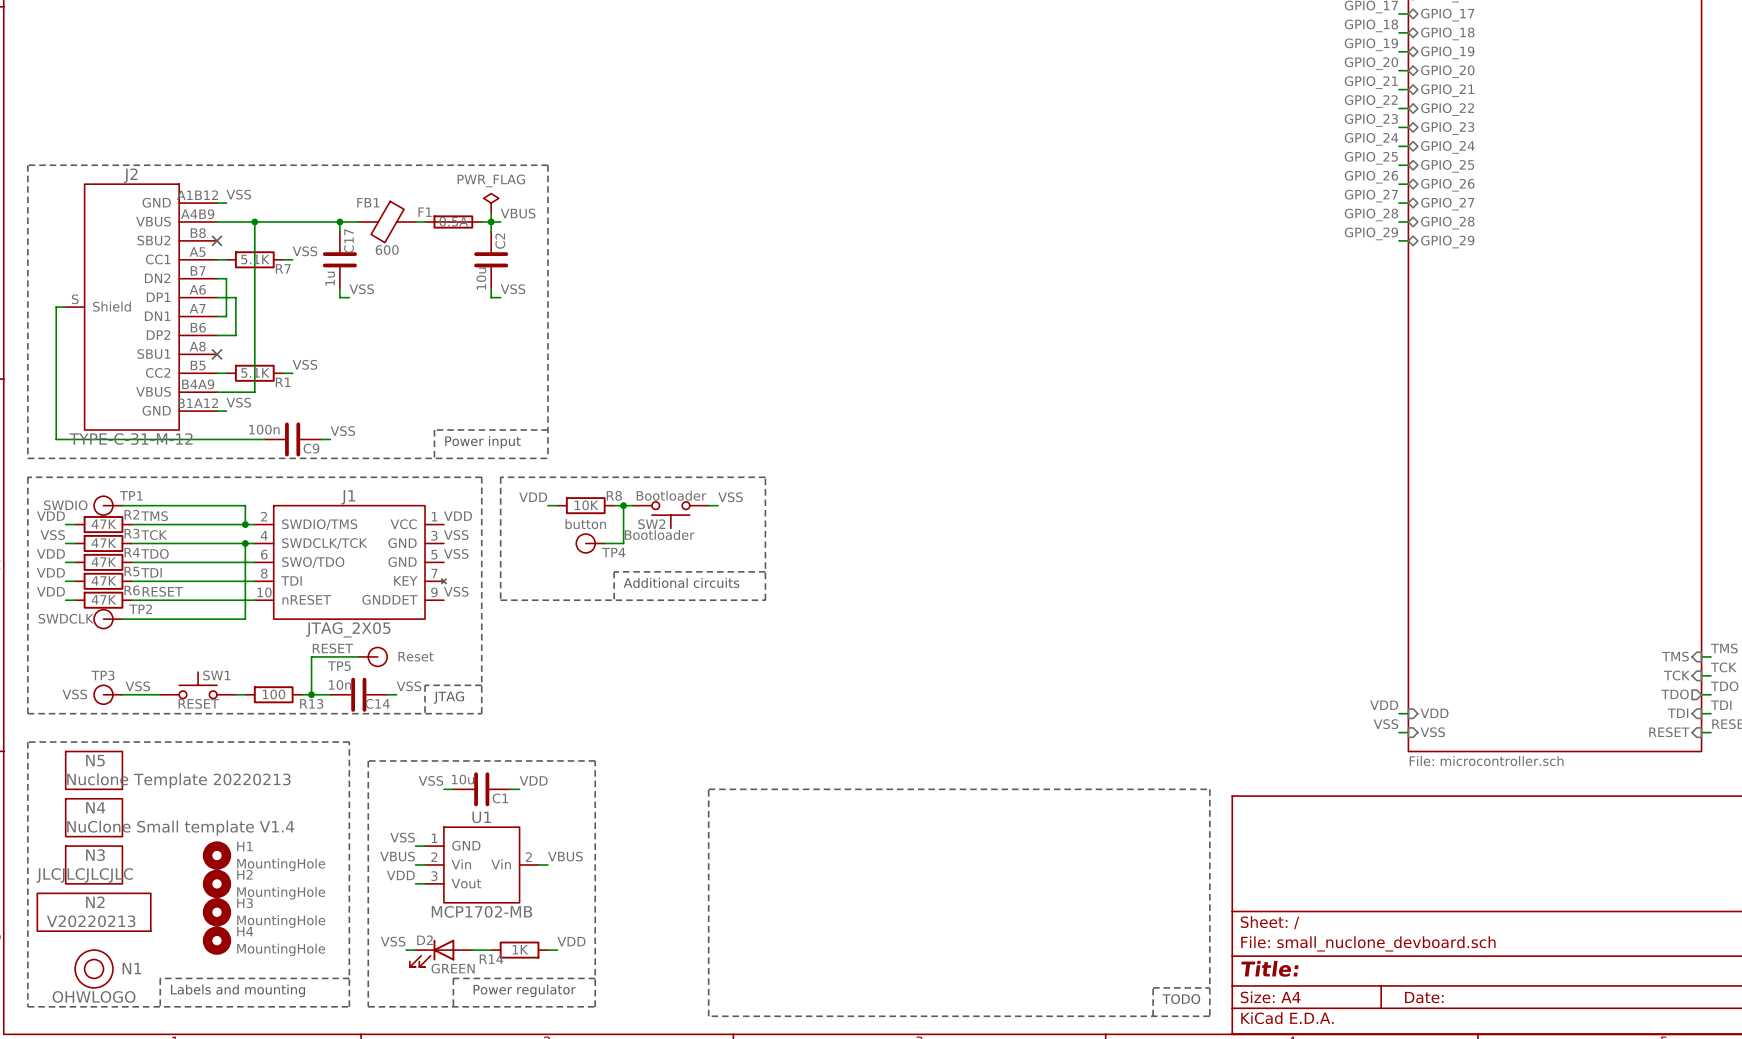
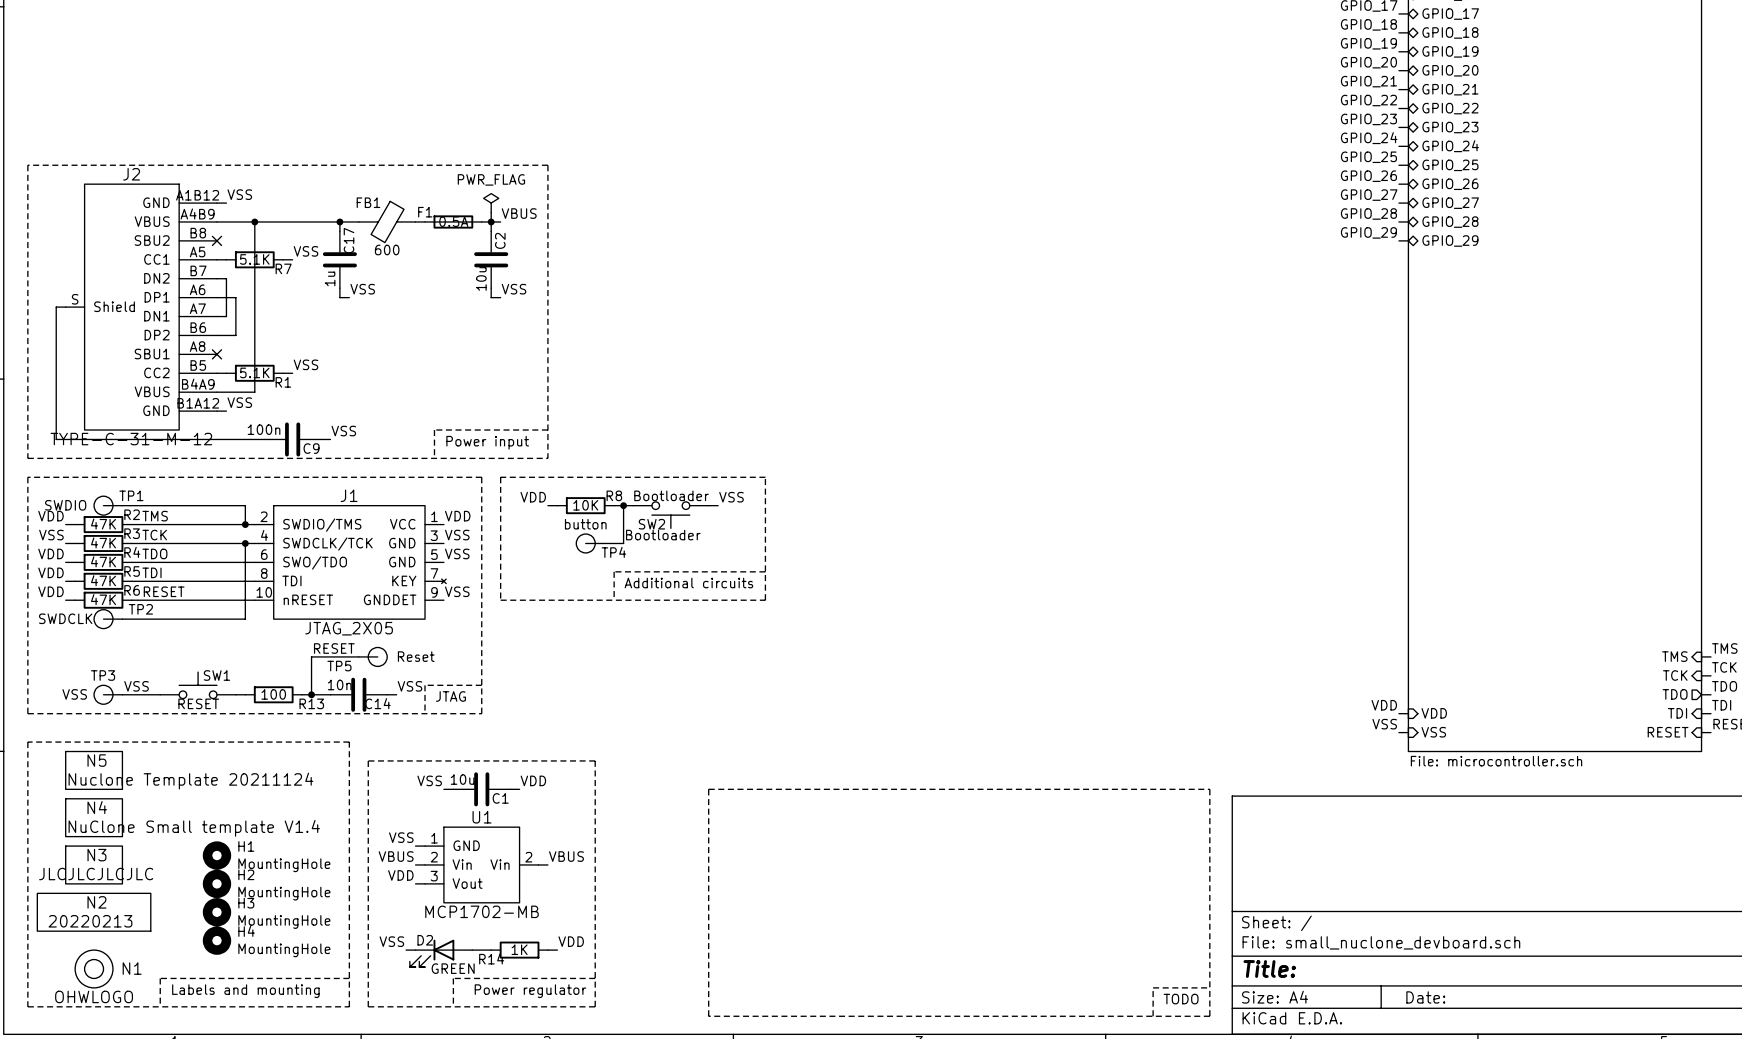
N5 value: Nuclone Template 20220213 (178, 780) -> Nuclone Template 20211124 (190, 781)
N2 value: V20220213 (91, 921) -> 20220213 (90, 921)

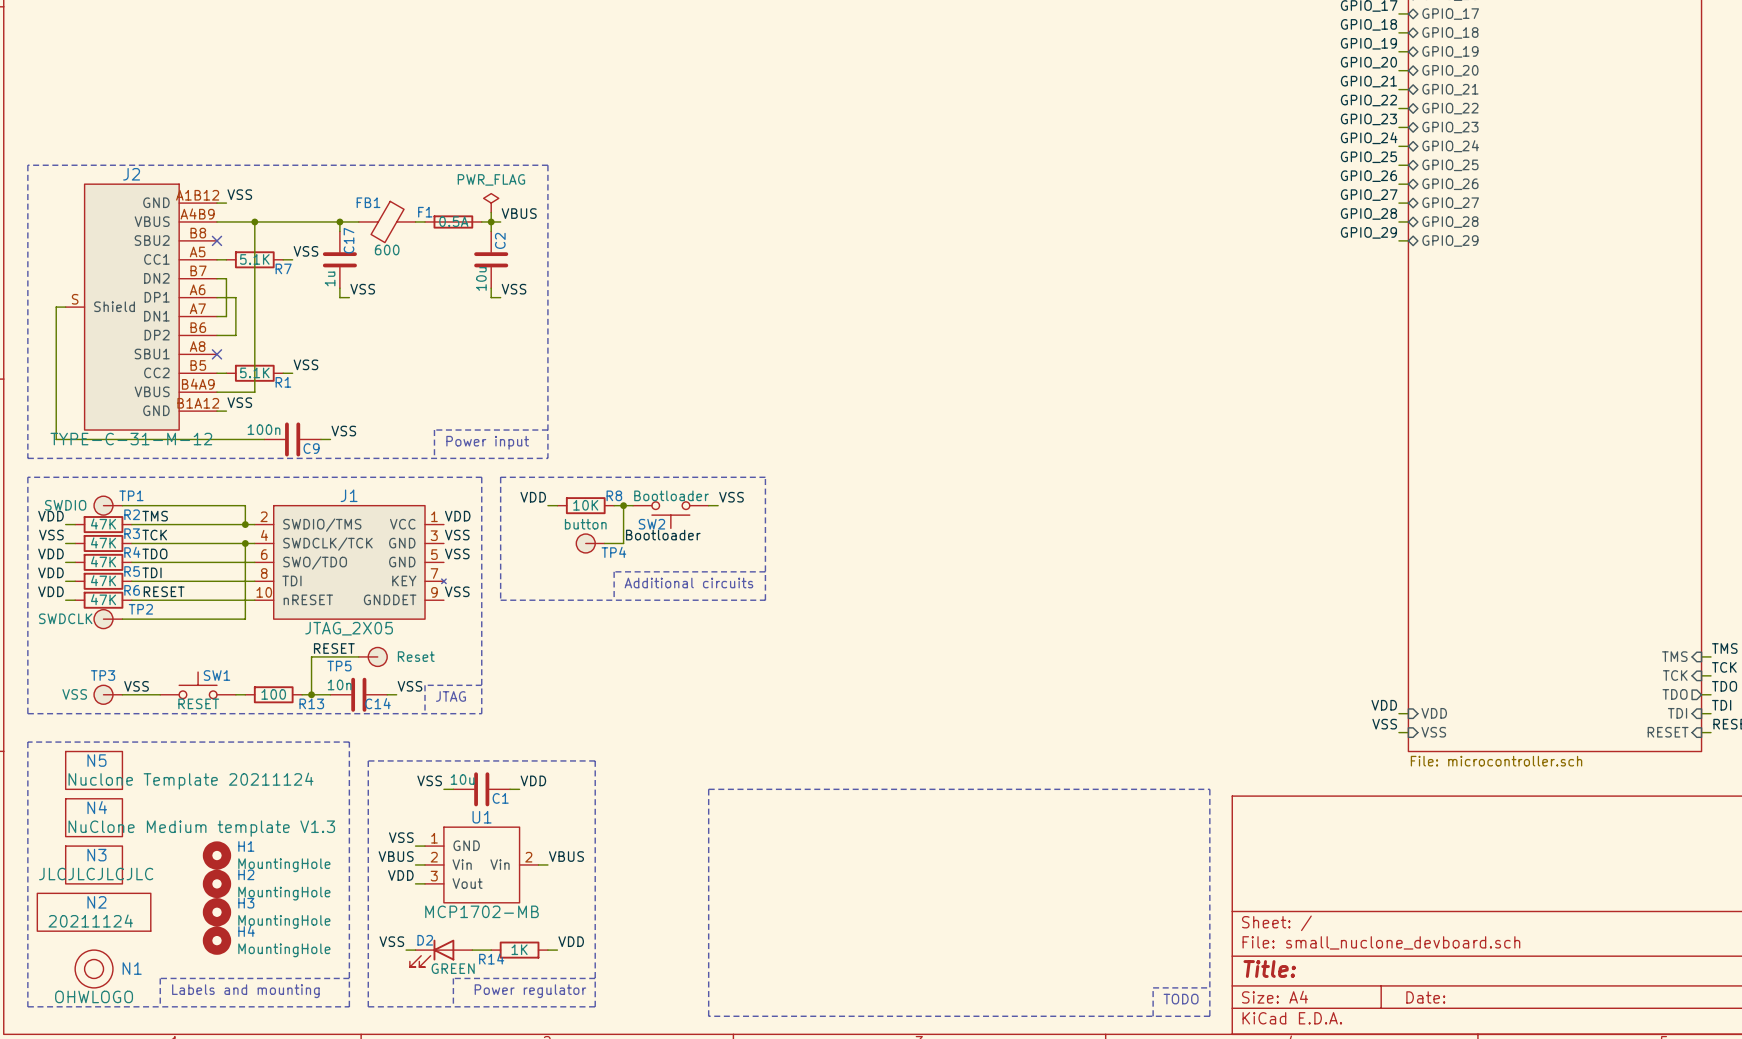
N4 value: NuClone Small template V1.4 (194, 828) -> NuClone Medium template V1.3 (201, 828)
N2 value: 20220213 (90, 921) -> 20211124 (90, 921)

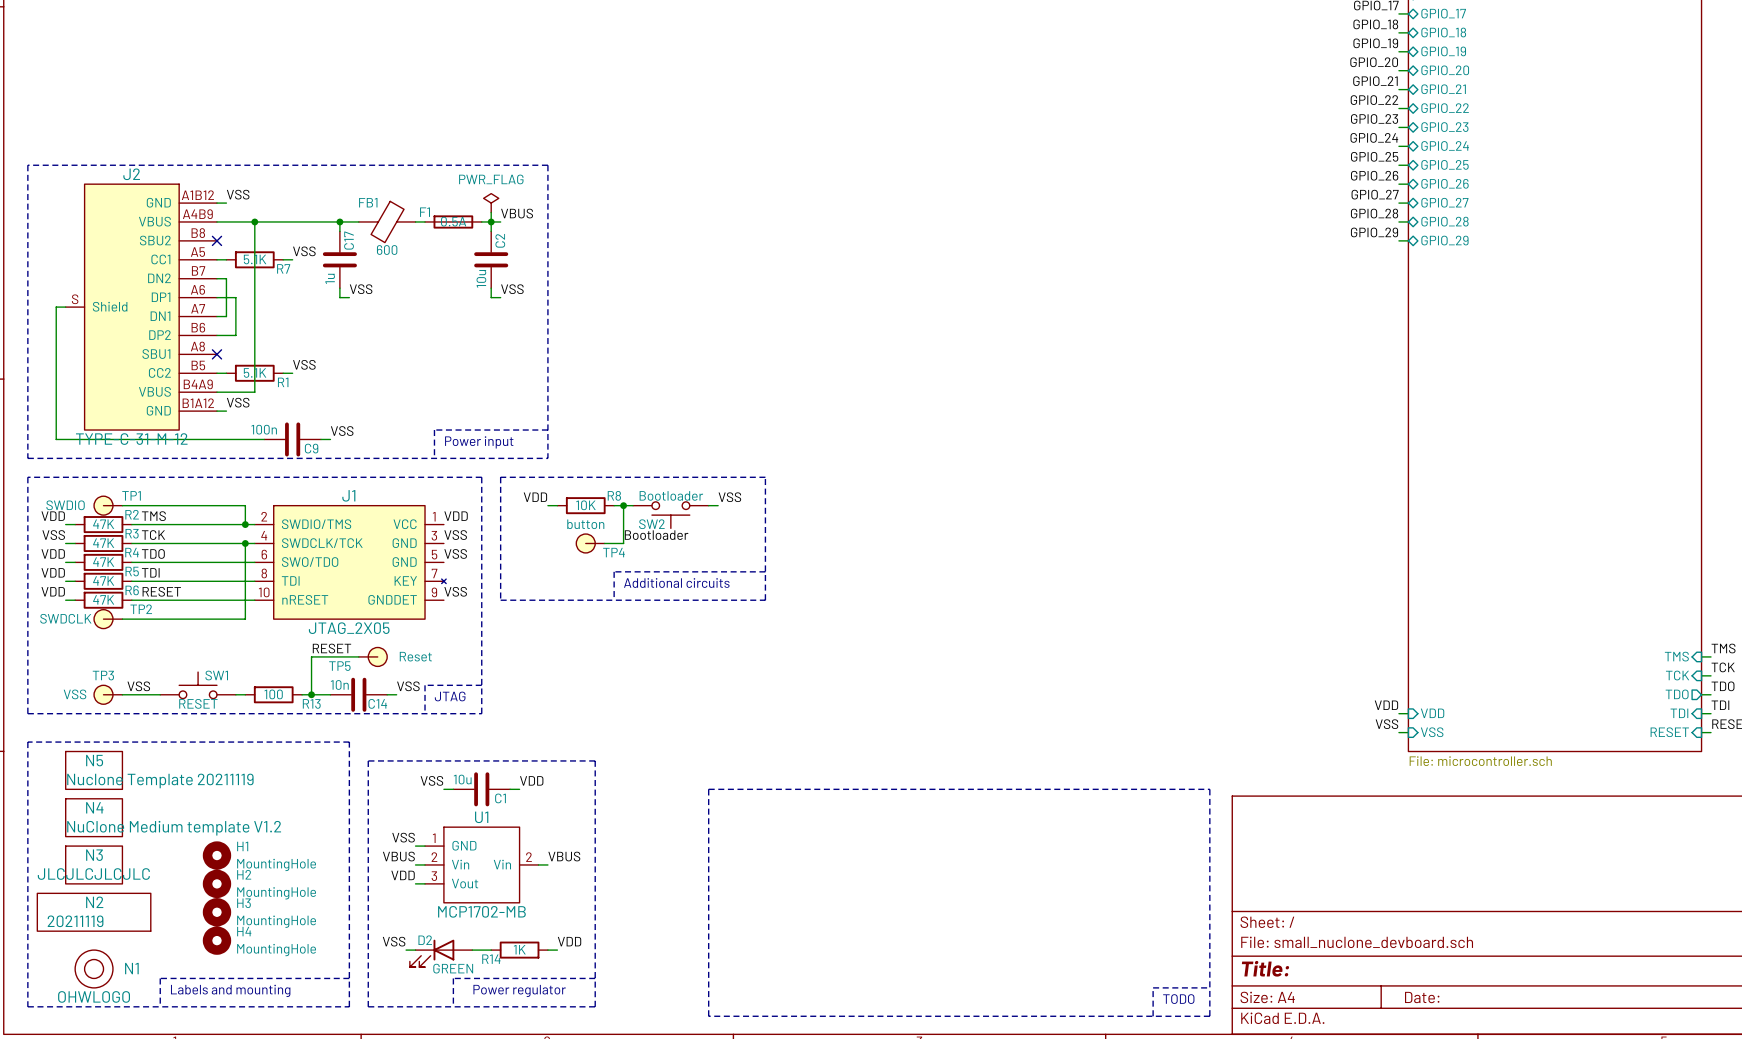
N5 value: Nuclone Template 20211124 (190, 781) -> Nuclone Template 20211119 (160, 780)
N4 value: NuClone Medium template V1.3 (201, 828) -> NuClone Medium template V1.2 (174, 828)
N2 value: 20211124 (90, 921) -> 20211119 (75, 921)

